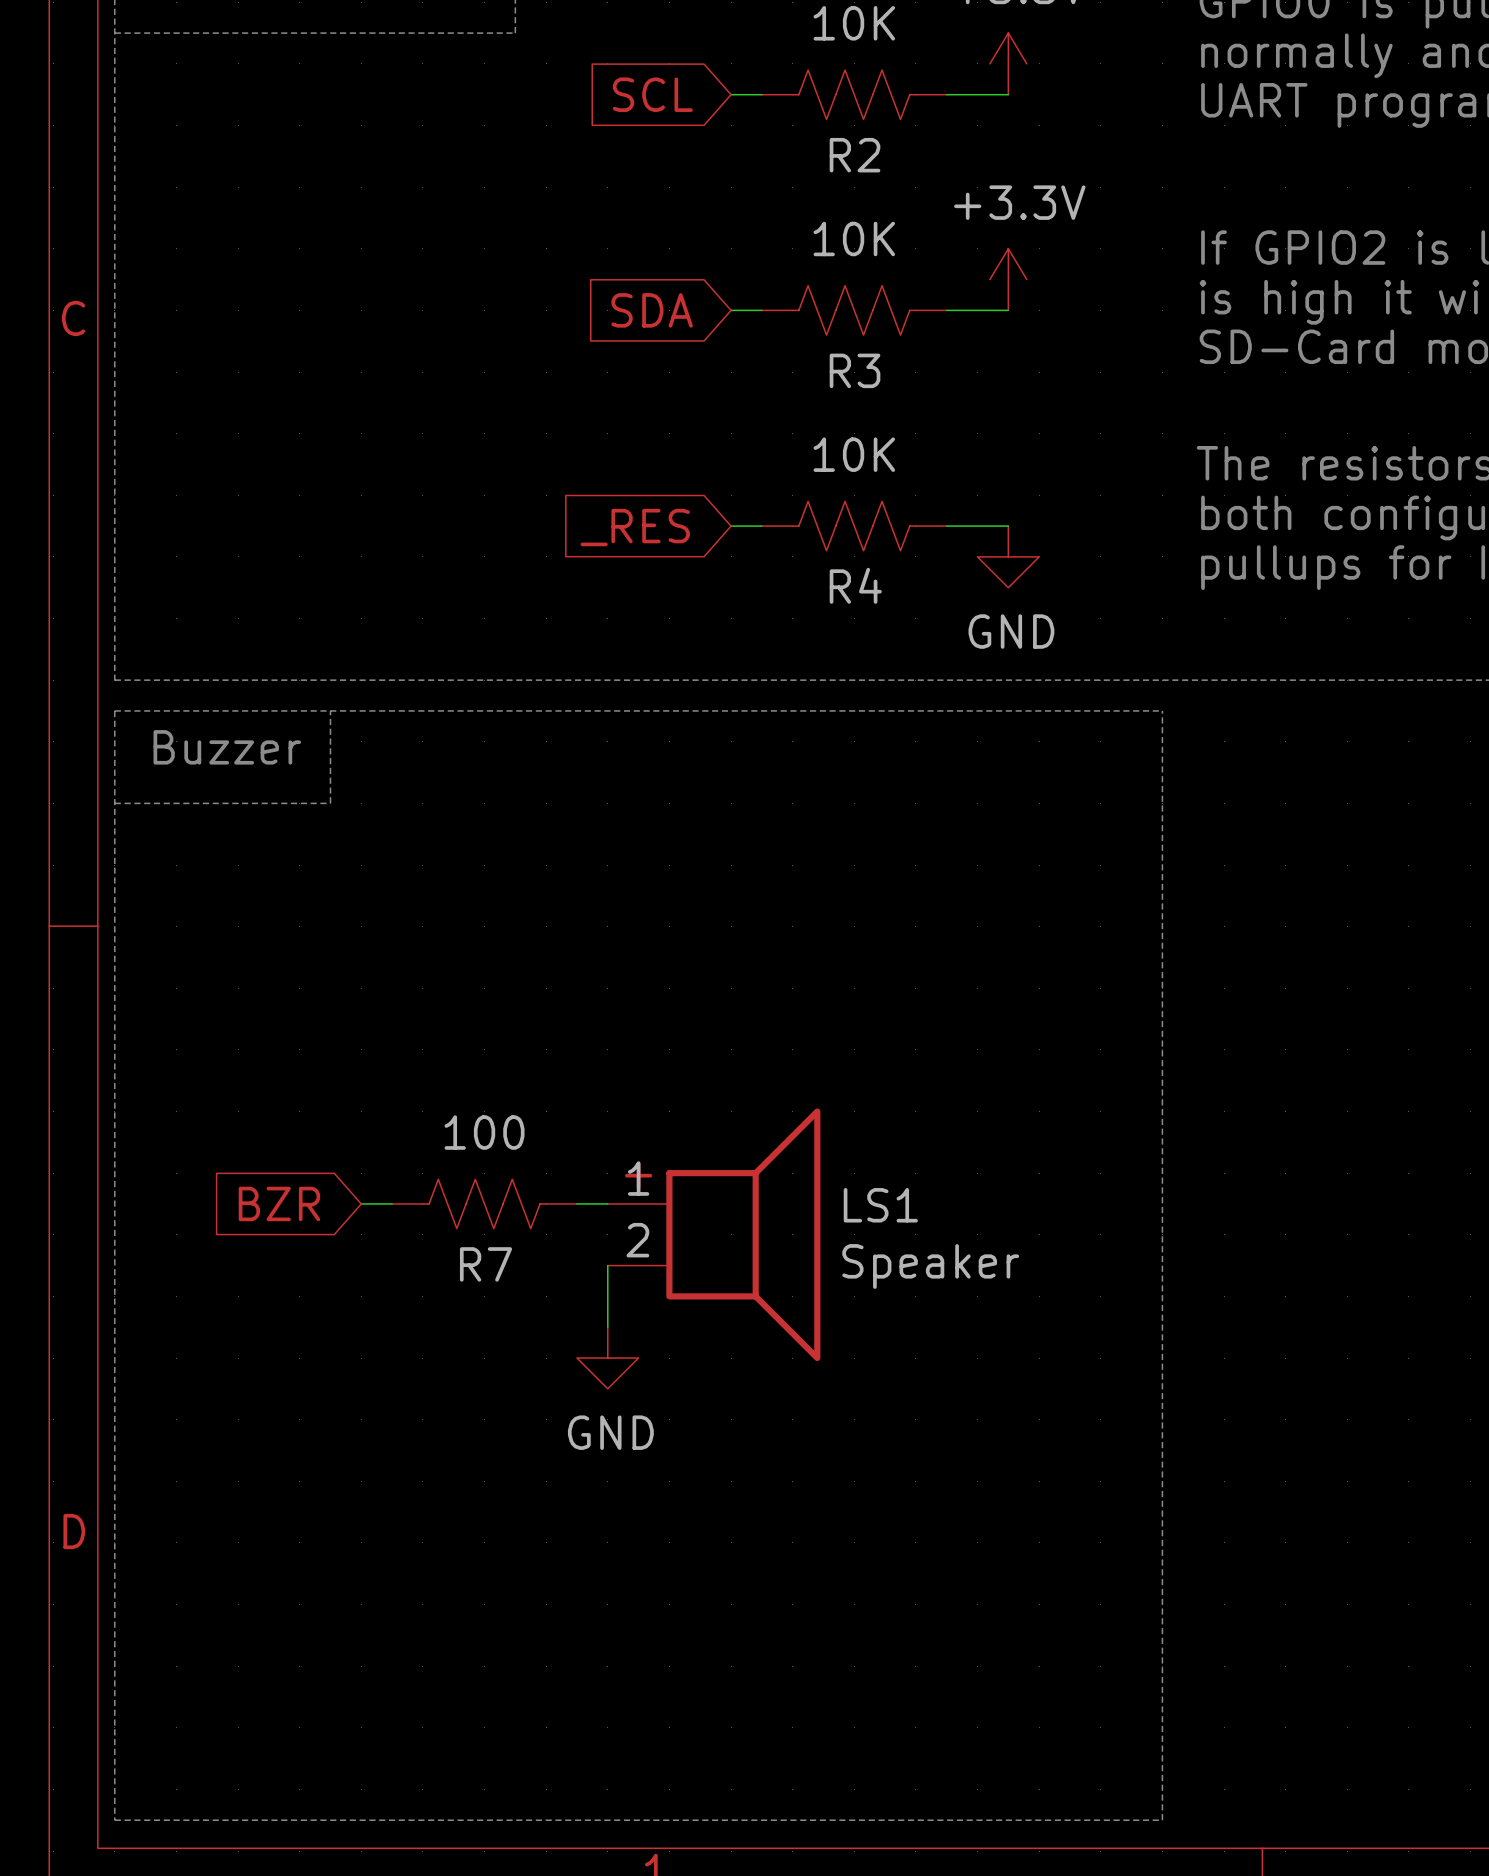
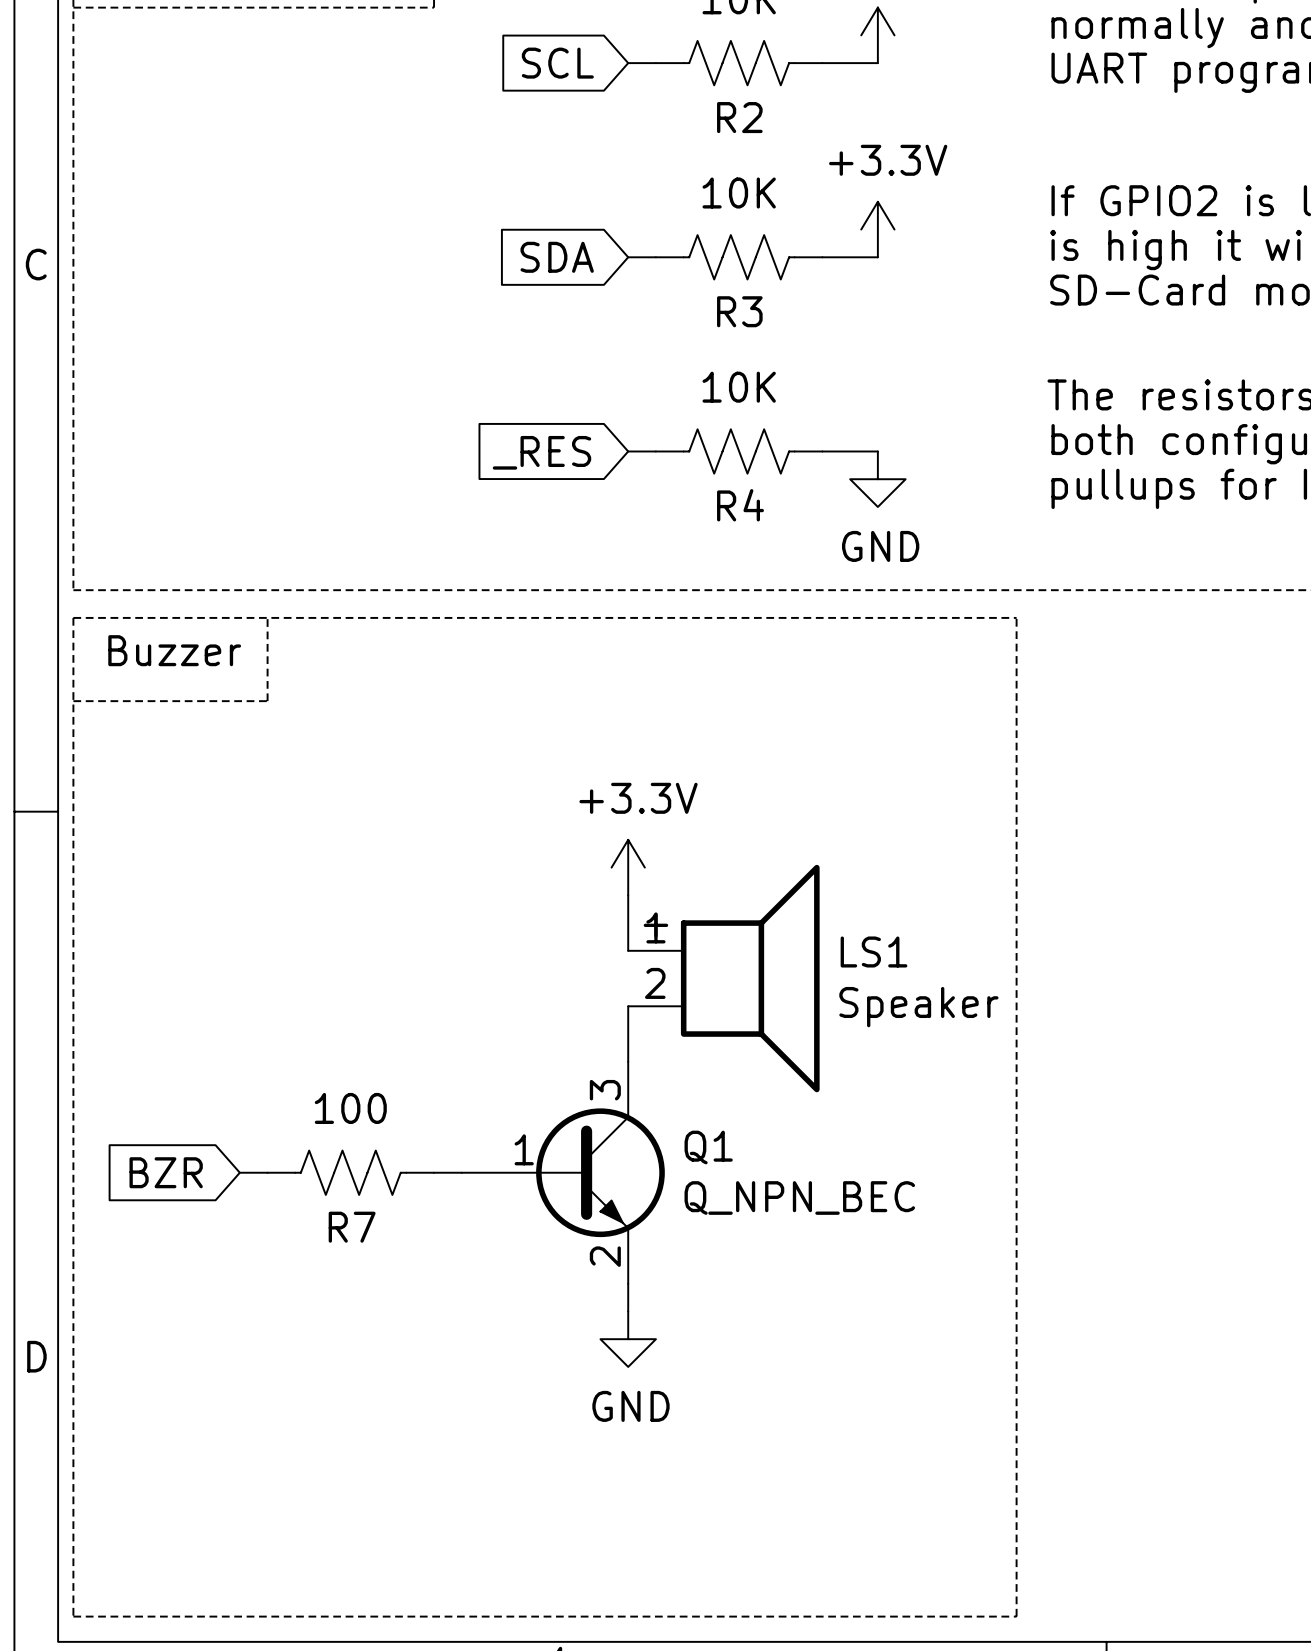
power symbol: none -> +3.3V (628, 867)
wire: none -> (628, 895) (628, 950)
global label position: BZR (279, 1203) -> BZR (166, 1172)
wire: (361, 1203) (392, 1203) -> (239, 1172) (267, 1172)
R7 position: (484, 1203) -> (350, 1172)
wire: (576, 1203) (607, 1203) -> (434, 1172) (461, 1172)
LS1 position: (714, 1234) -> (723, 978)
wire: (607, 1265) (607, 1327) -> (628, 1006) (628, 1061)
Q1: none -> Q_NPN_BEC (563, 1172)
power symbol position: GND (607, 1358) -> GND (628, 1339)
wire: none -> (628, 1283) (628, 1311)

